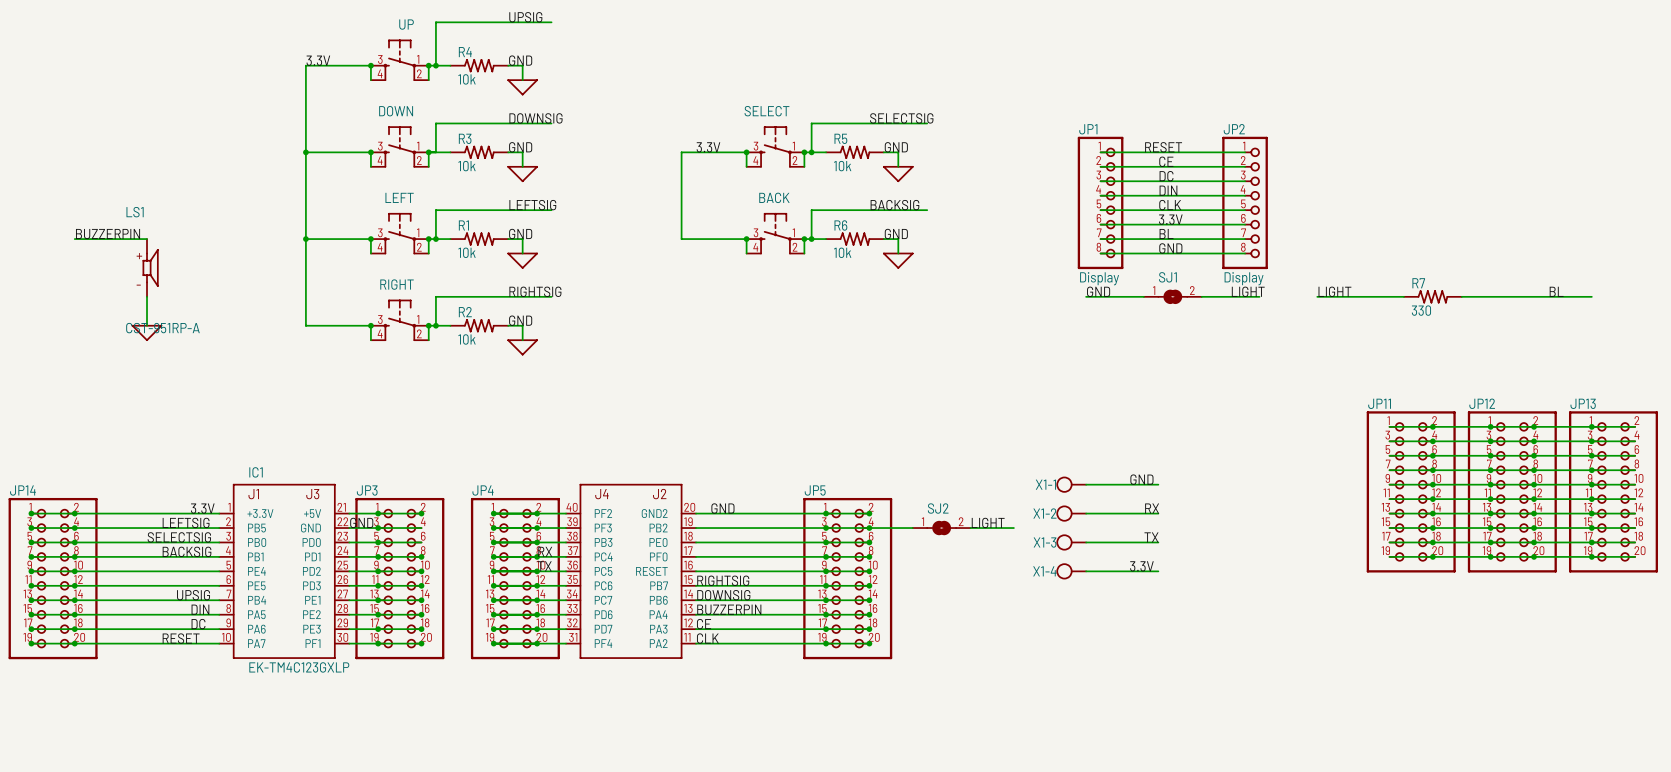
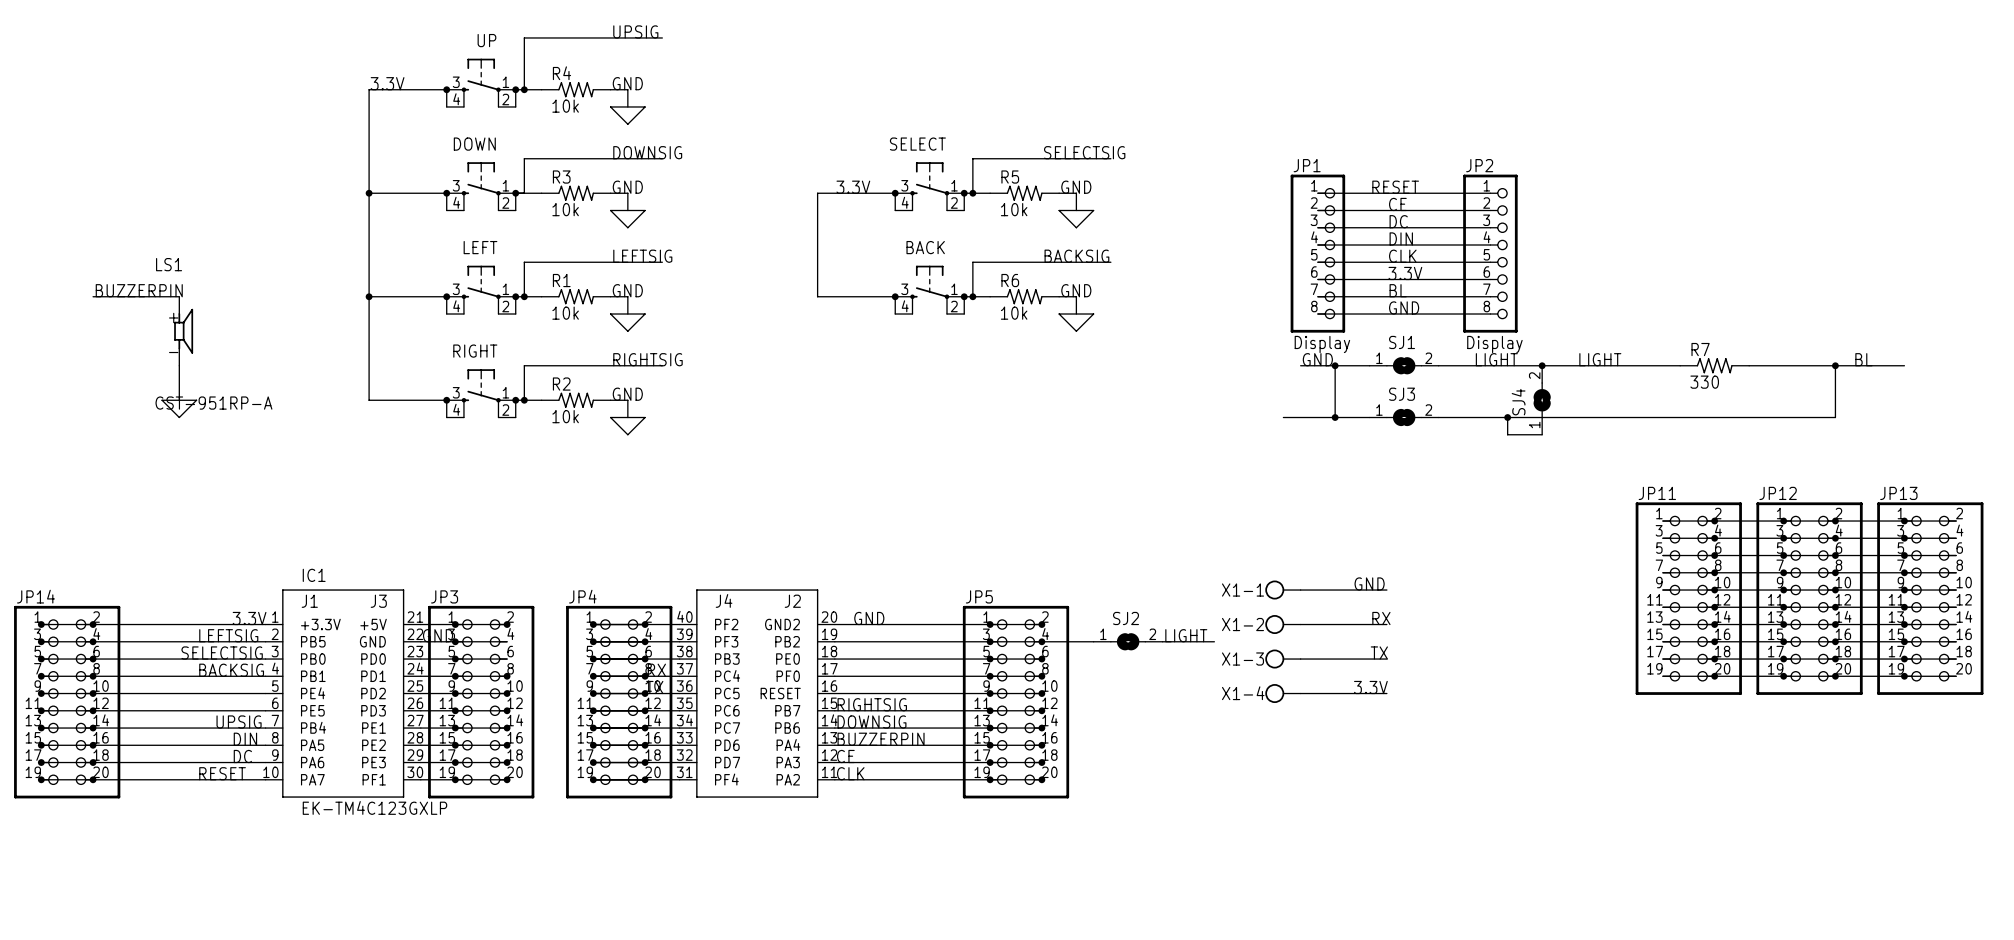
wire: none -> (1335, 365) (1335, 417)
junction: none -> (1335, 365)
wire: none -> (1507, 365) (1576, 365)
junction: none -> (1542, 365)
wire: none -> (1835, 365) (1835, 417) (1438, 417)
junction: none -> (1835, 365)
SJ4: none -> (1542, 400)
wire: none -> (1283, 417) (1369, 417)
junction: none -> (1335, 417)
SJ3: none -> (1404, 417)
wire: none -> (1507, 417) (1507, 434) (1542, 434)
junction: none -> (1507, 417)

